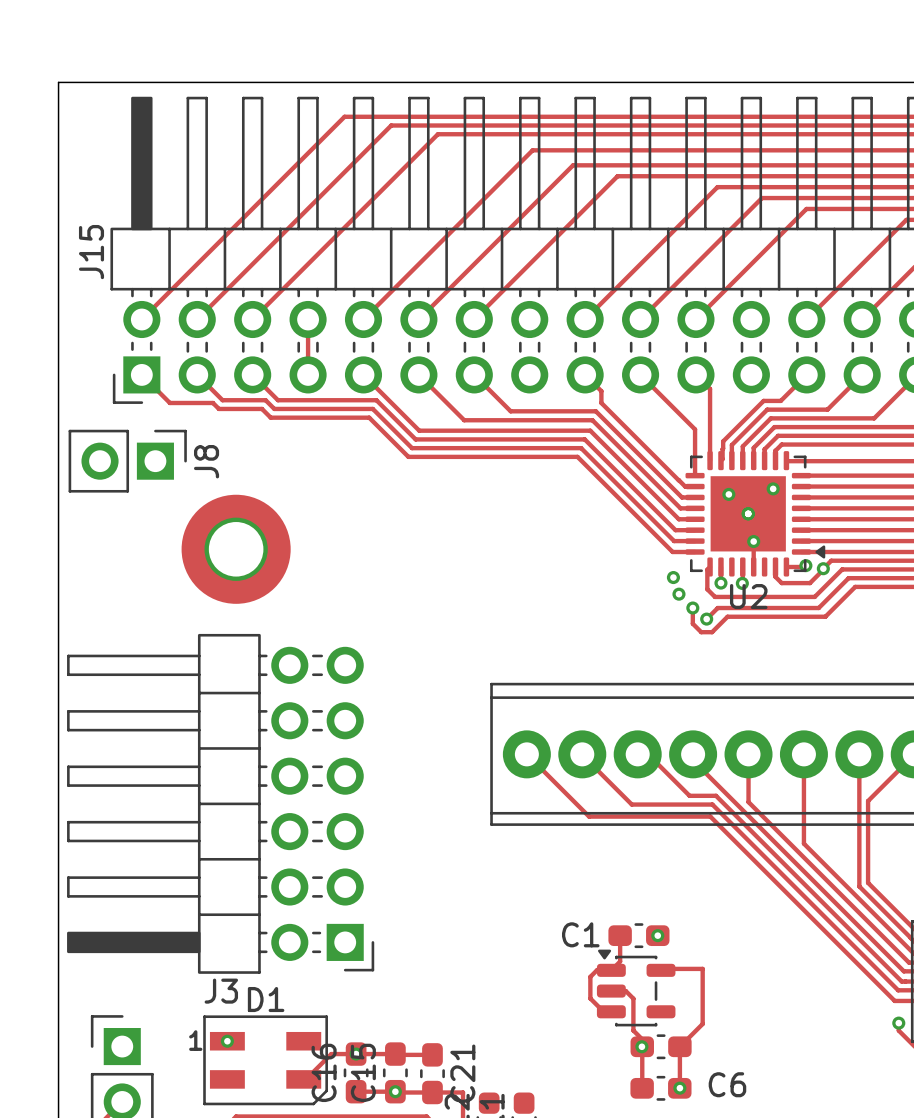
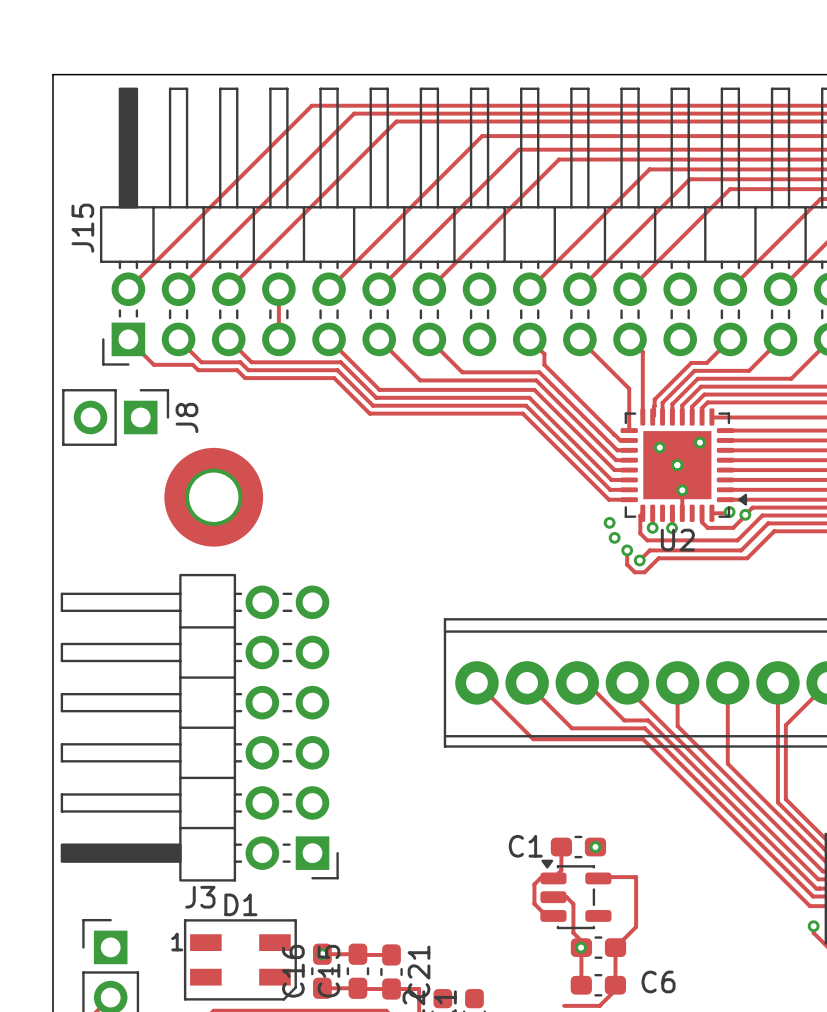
via: (227, 1041) -> none
track: (356, 1054) (331, 1054) (303, 1079) -> none
via: (679, 1088) -> none
via: (395, 1091) -> none
track: none -> (615, 990) (599, 1005) (564, 1005)

